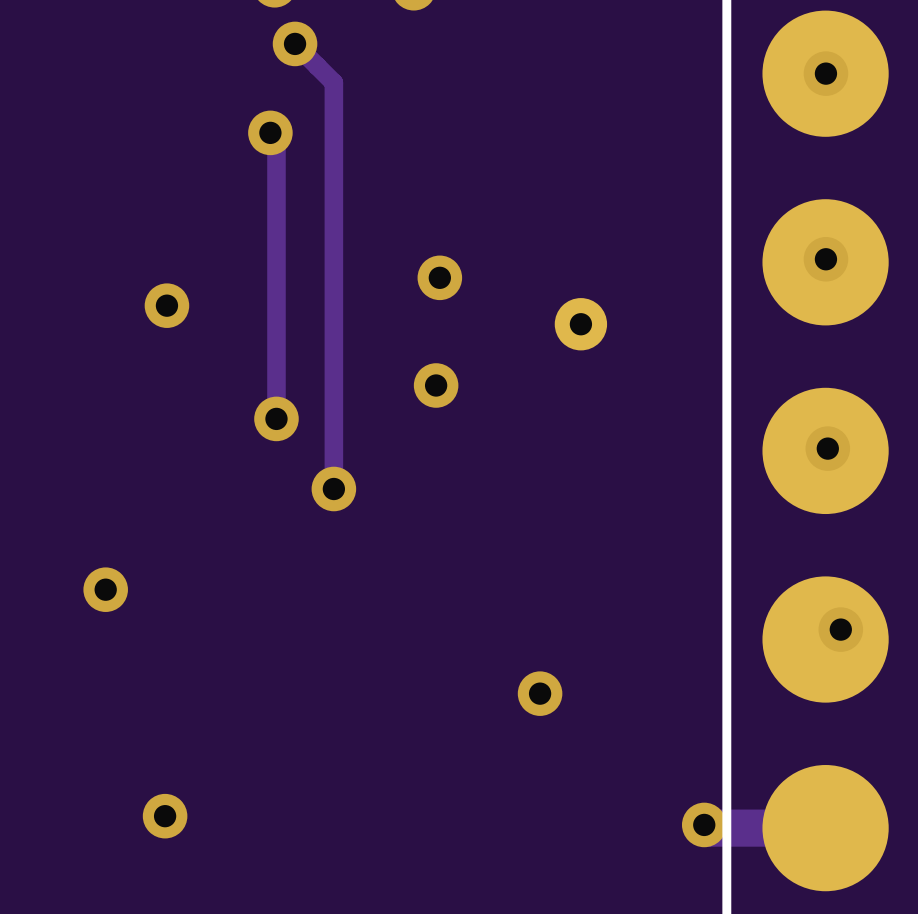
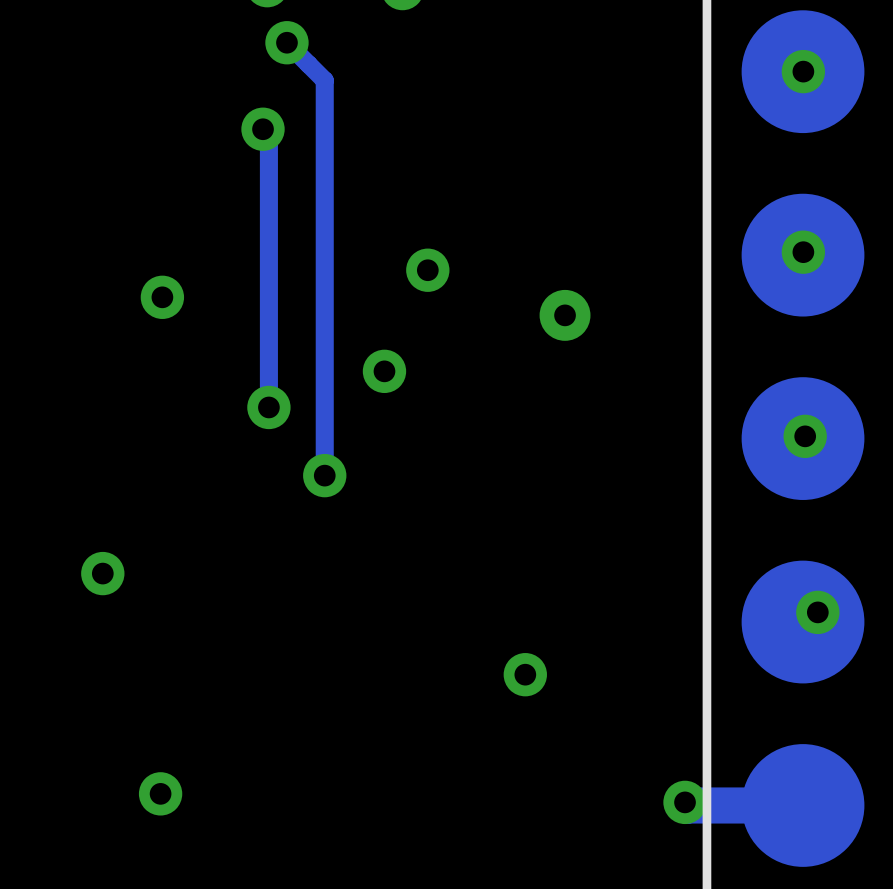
via position: (436, 385) -> (384, 371)

